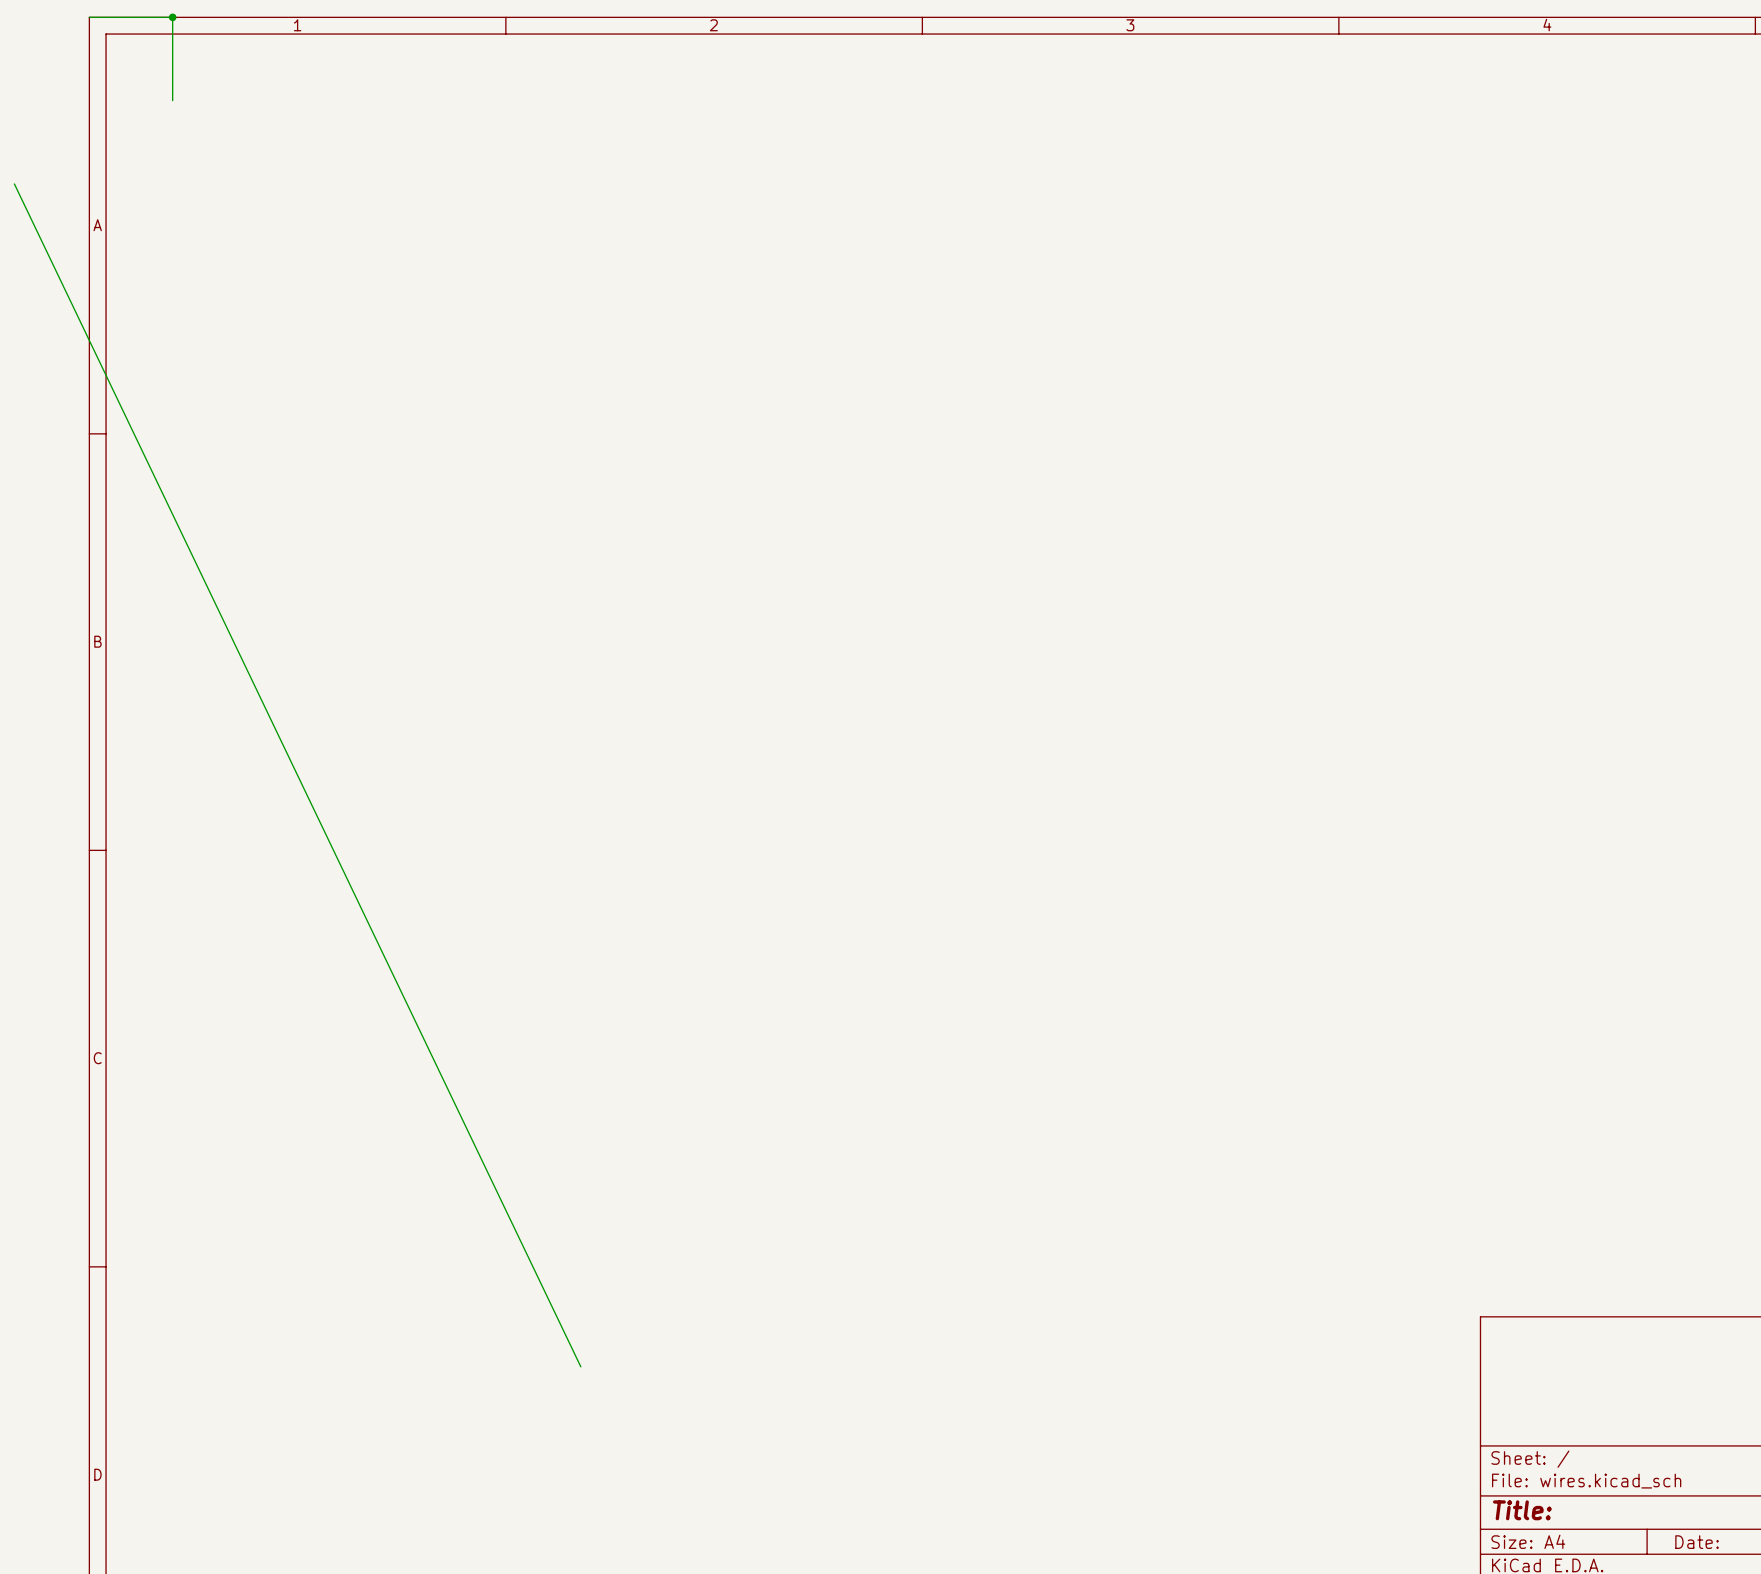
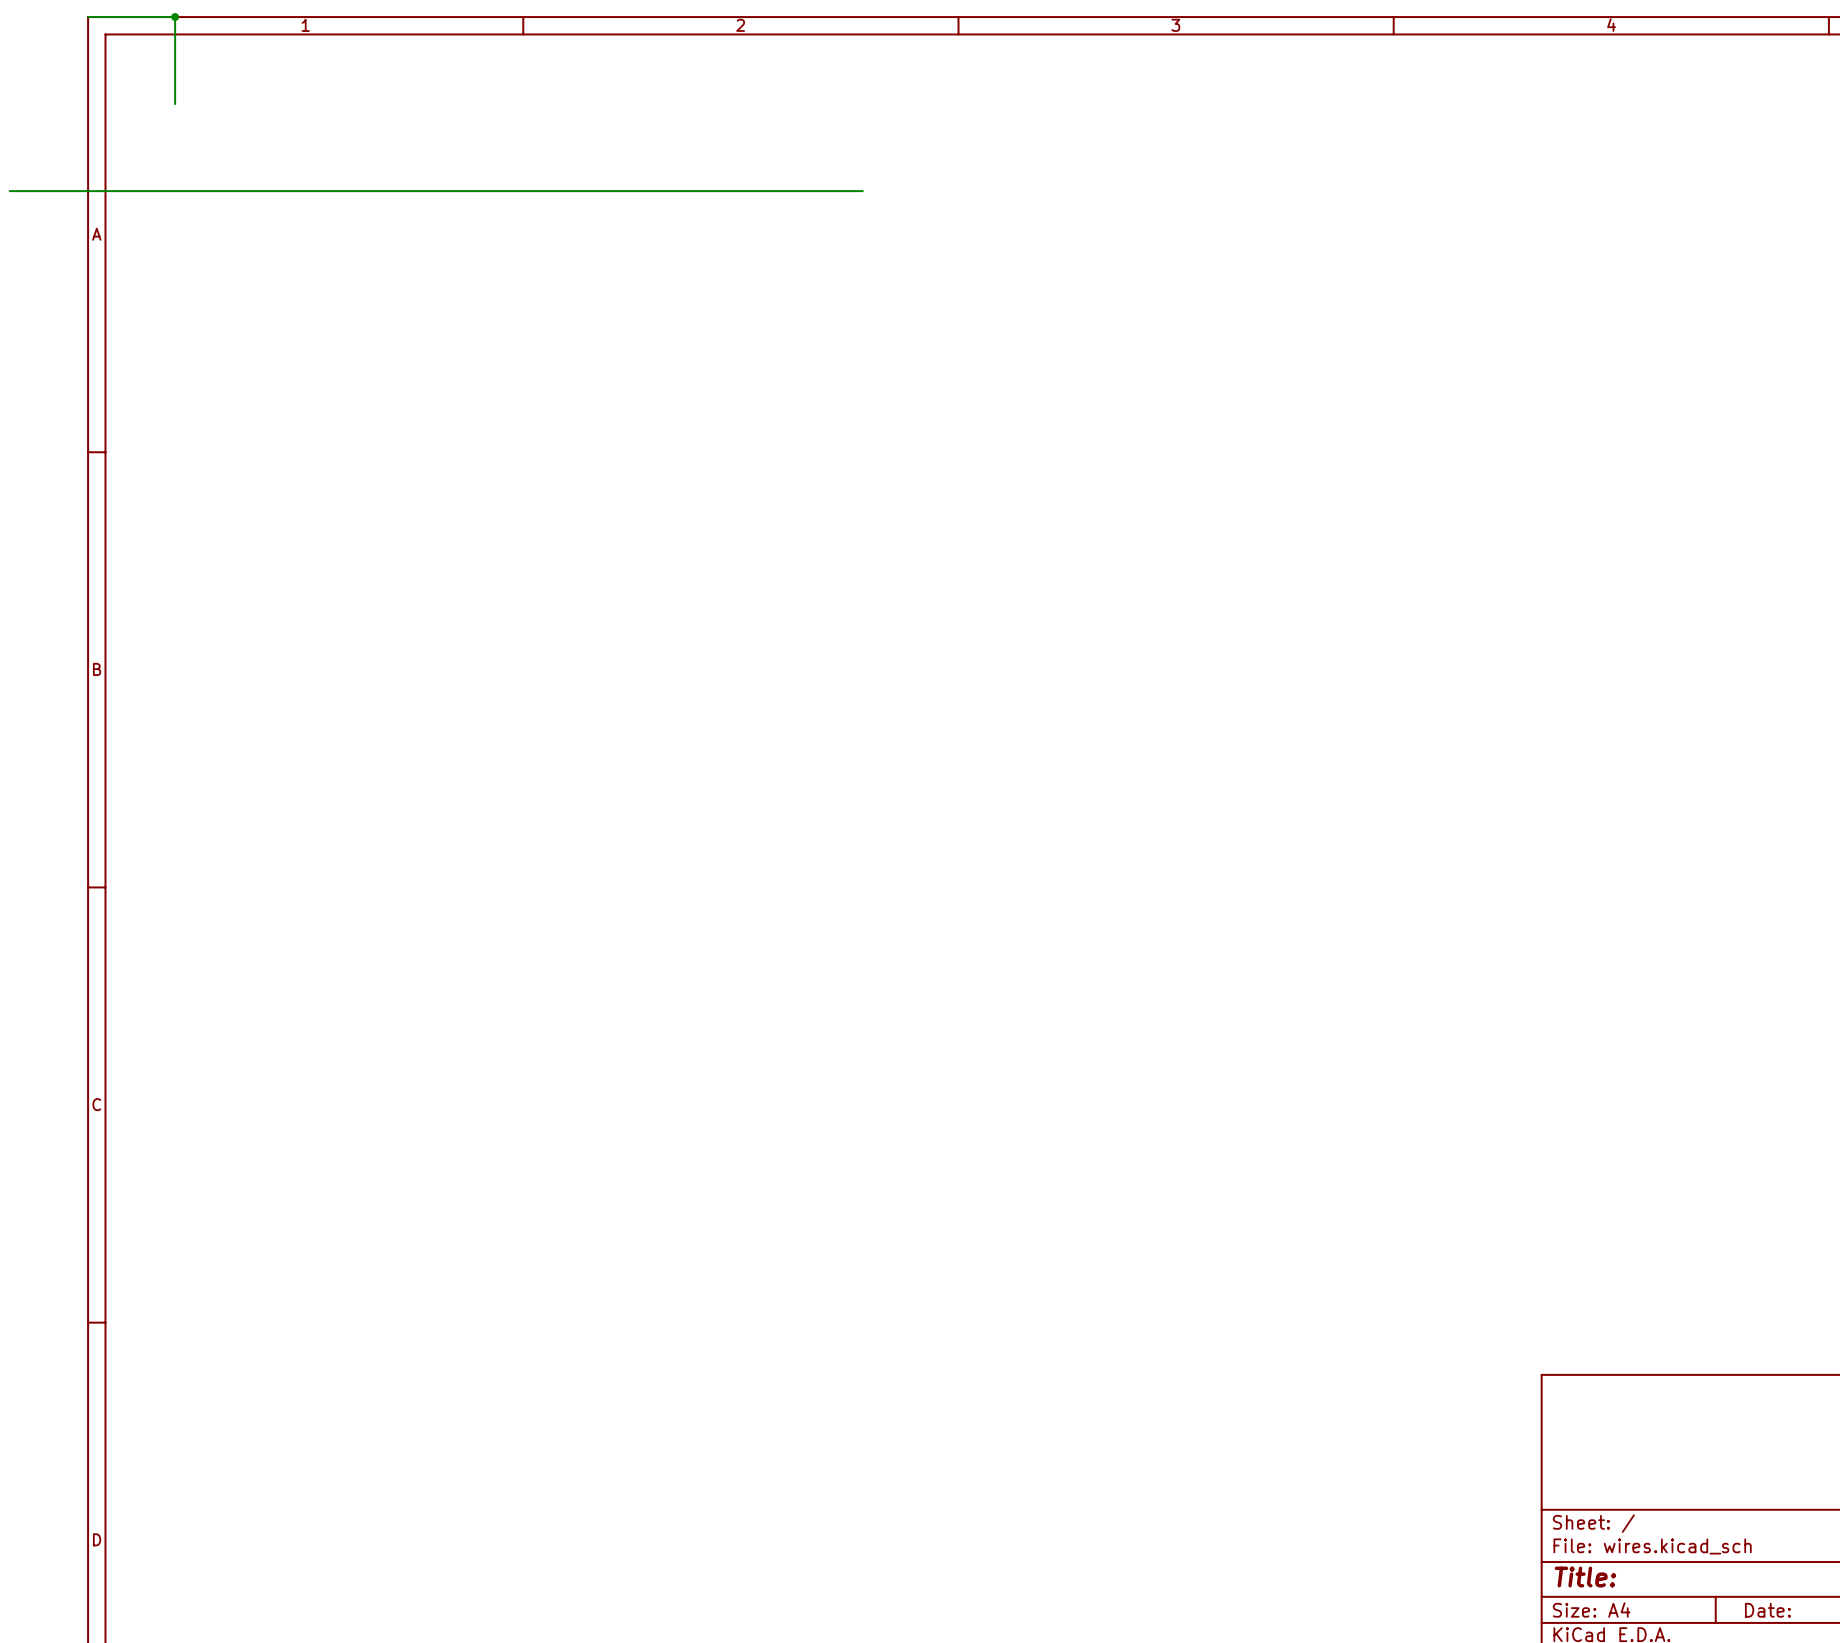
wire: (14, 183) (580, 1366) -> (9, 191) (862, 191)

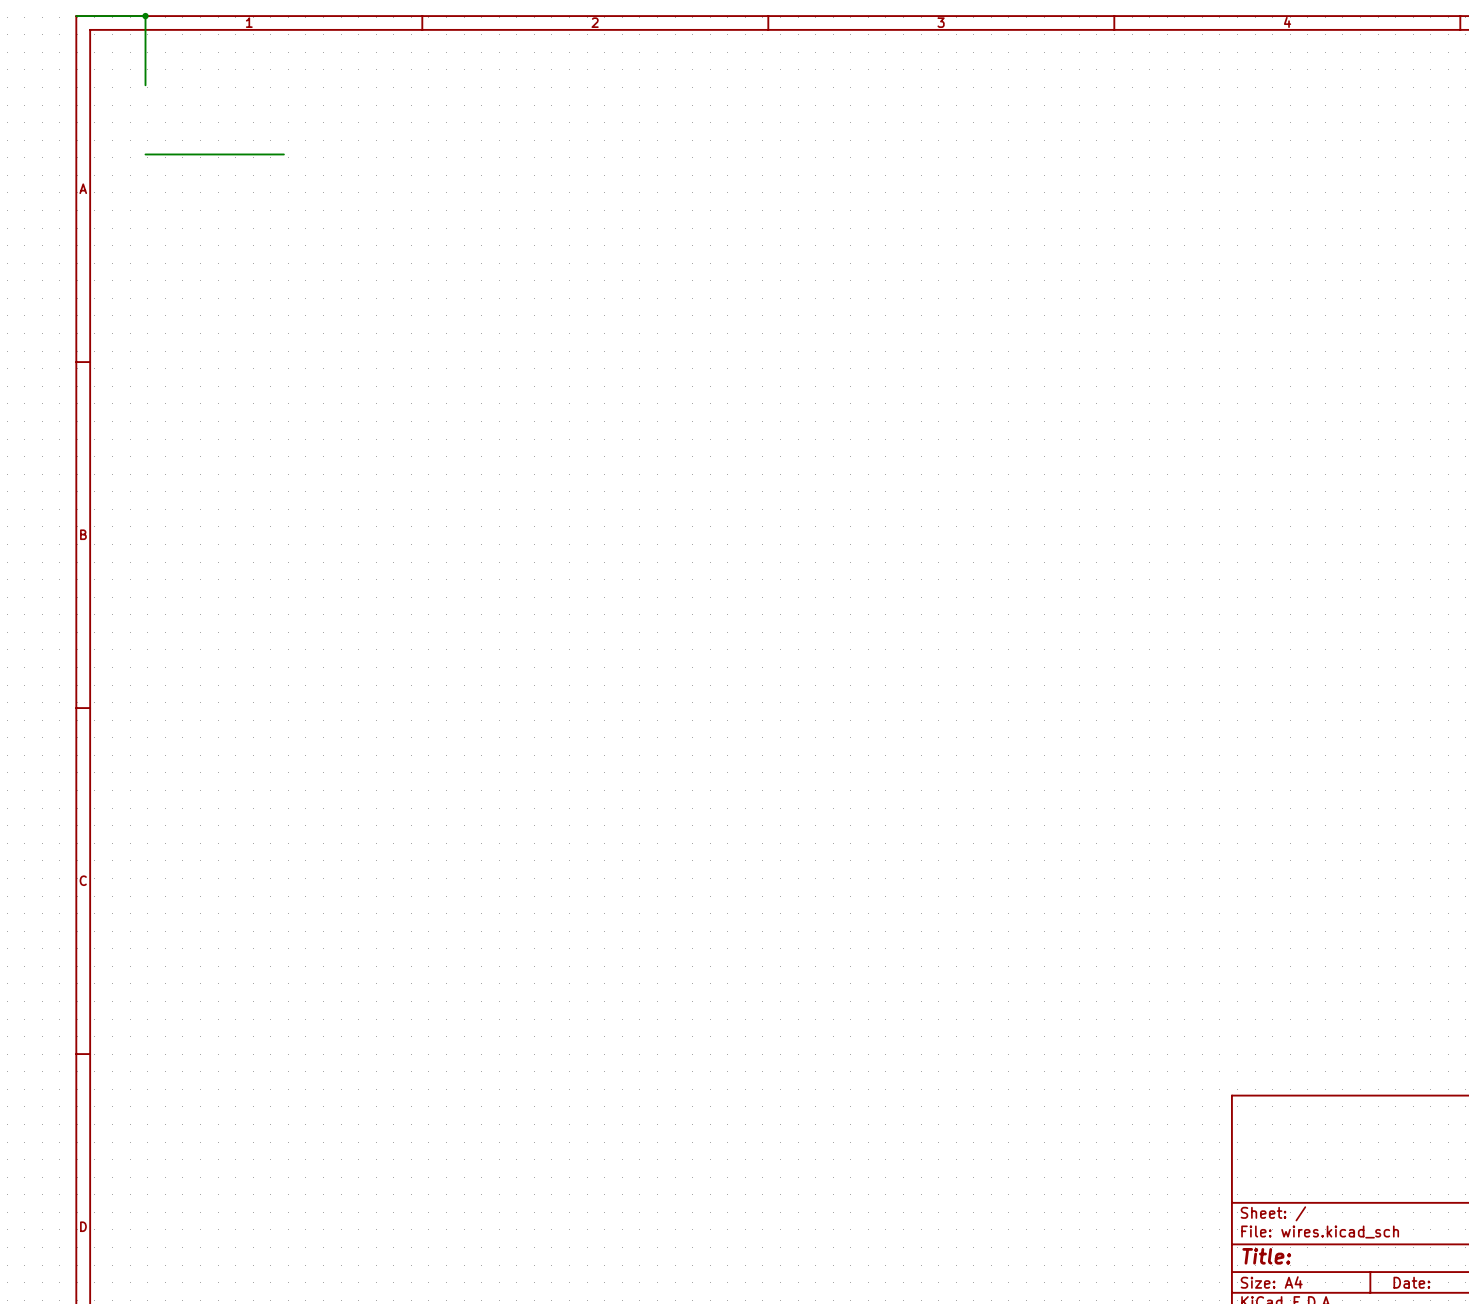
wire: (9, 191) (175, 191) -> none
wire: (349, 191) (862, 191) -> none

